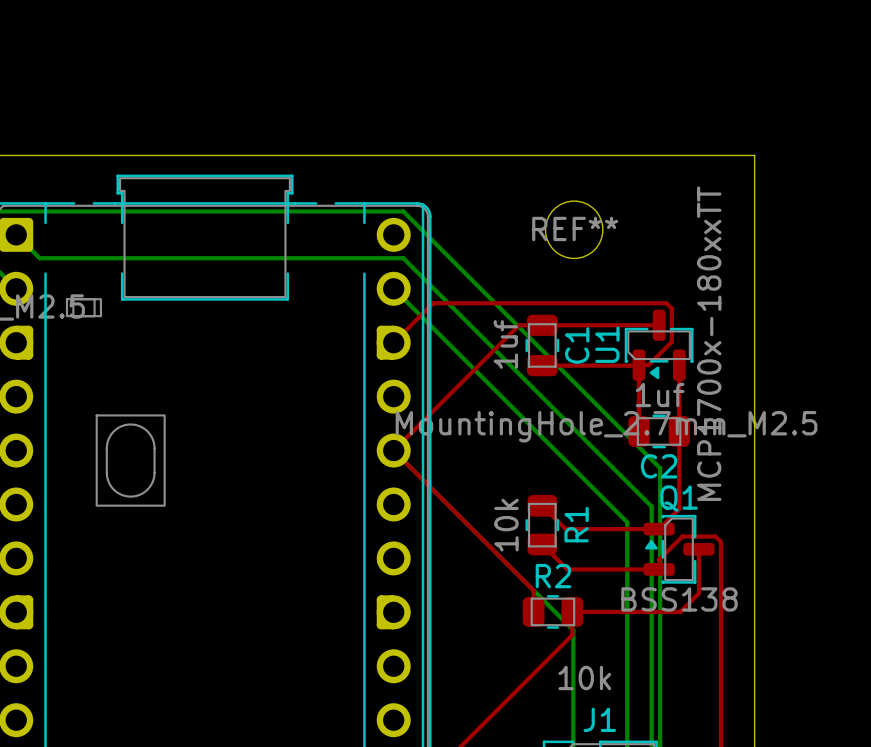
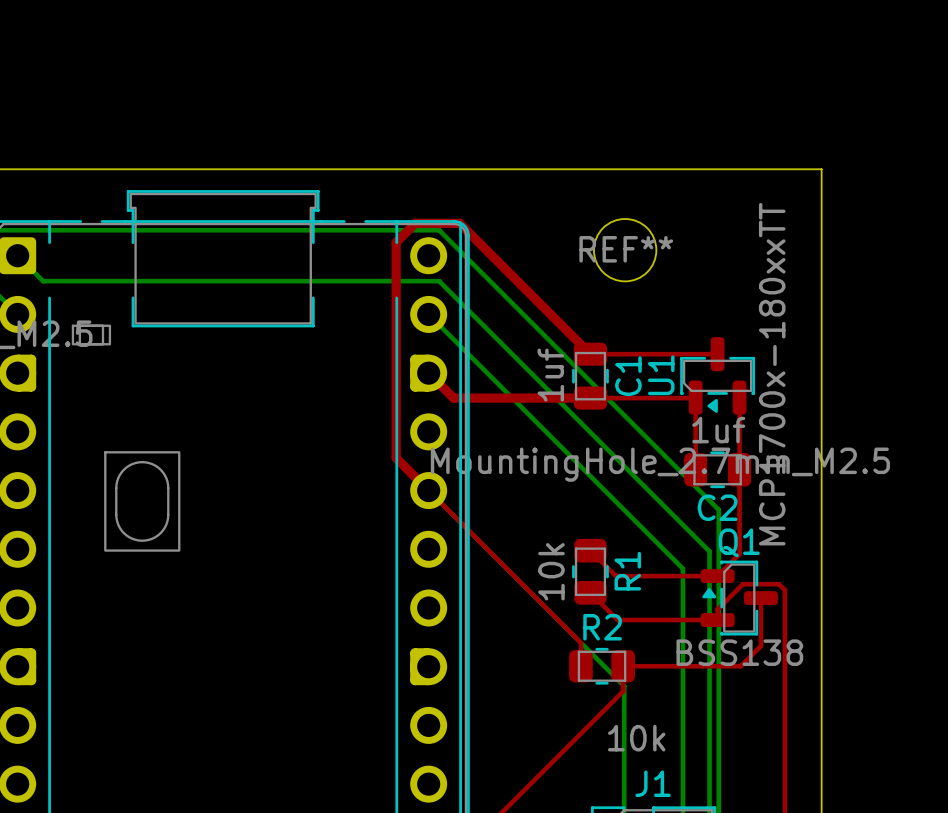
top track: (542, 325) (518, 325) (393, 450) -> (590, 354) (459, 223) (415, 223) (396, 242) (396, 458) (428, 490)
top track: (393, 342) (433, 303) (666, 303) (671, 308) (671, 341) (648, 365) (638, 365) -> (428, 373) (453, 398) (590, 398)

